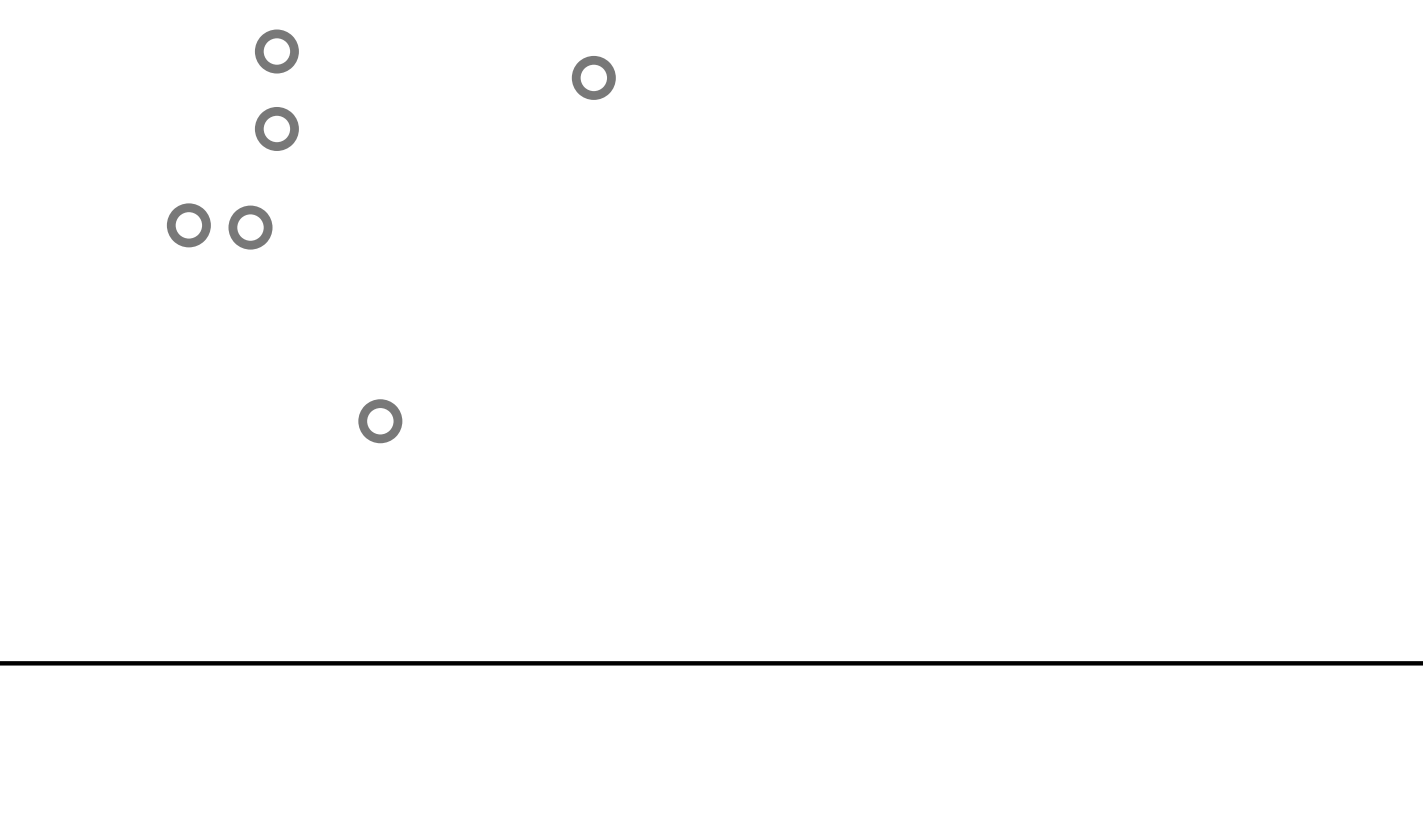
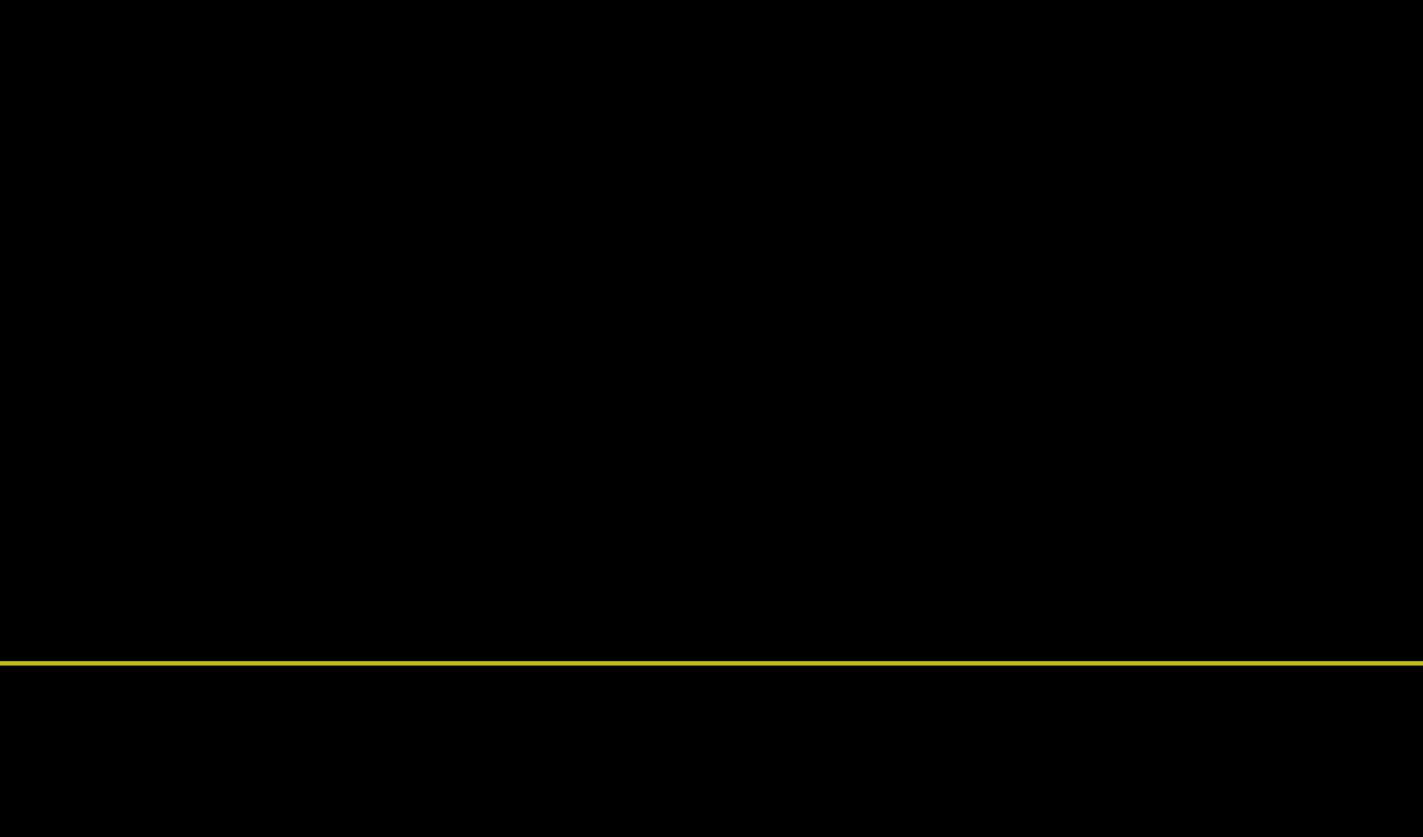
via: (276, 51) -> none
via: (593, 77) -> none
via: (276, 128) -> none
via: (188, 225) -> none
via: (250, 227) -> none
via: (380, 421) -> none

